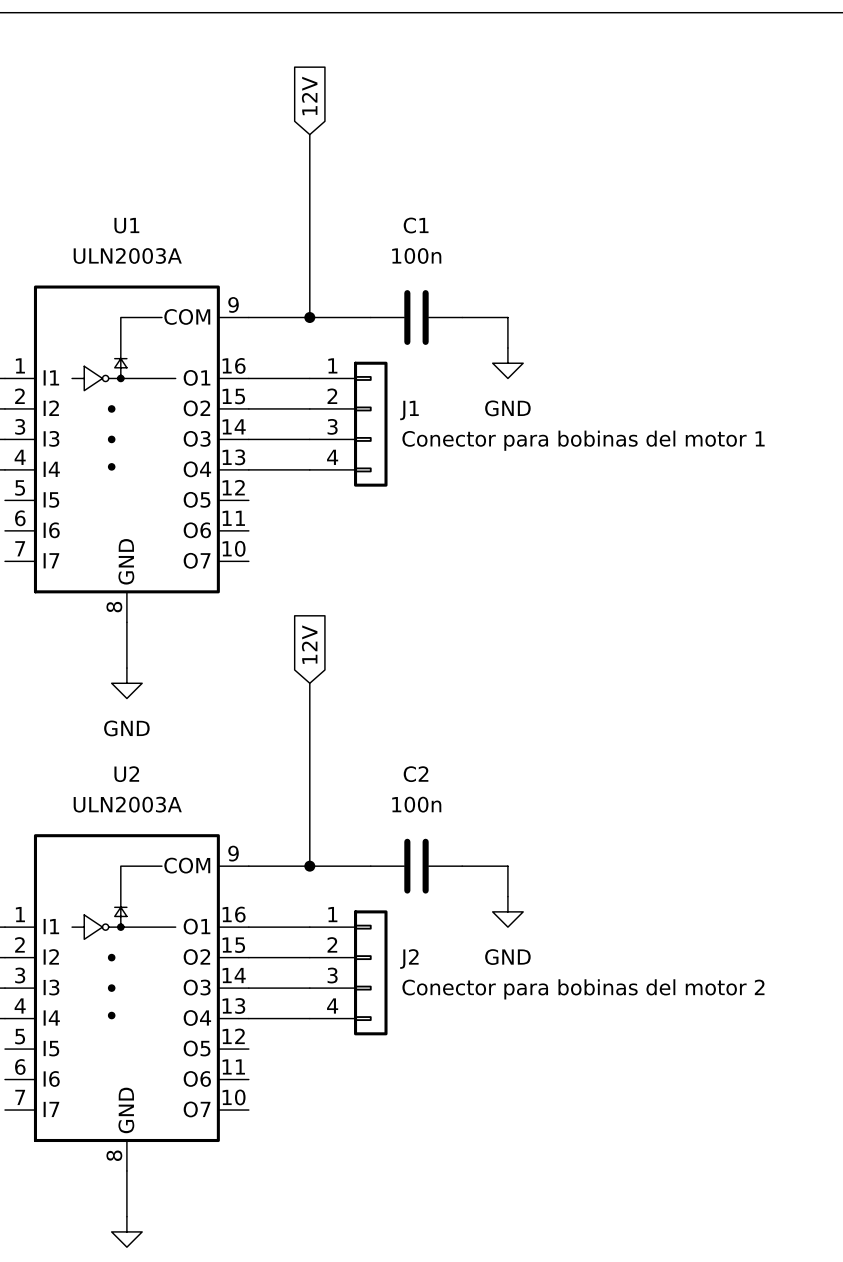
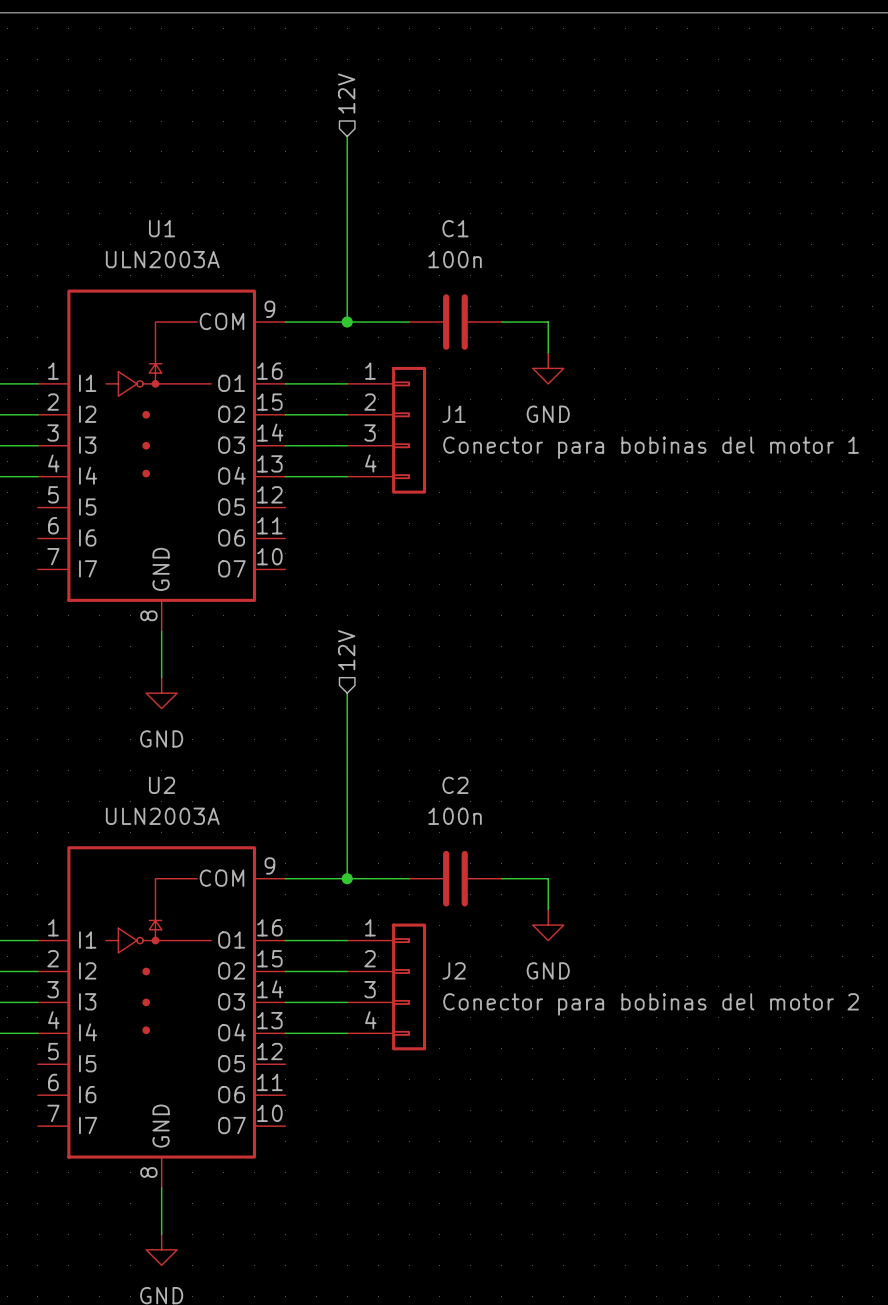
hierarchical label: none -> 12V (346, 93)
global label: 12V (309, 95) -> none
hierarchical label: none -> 12V (346, 650)
global label: 12V (309, 644) -> none

